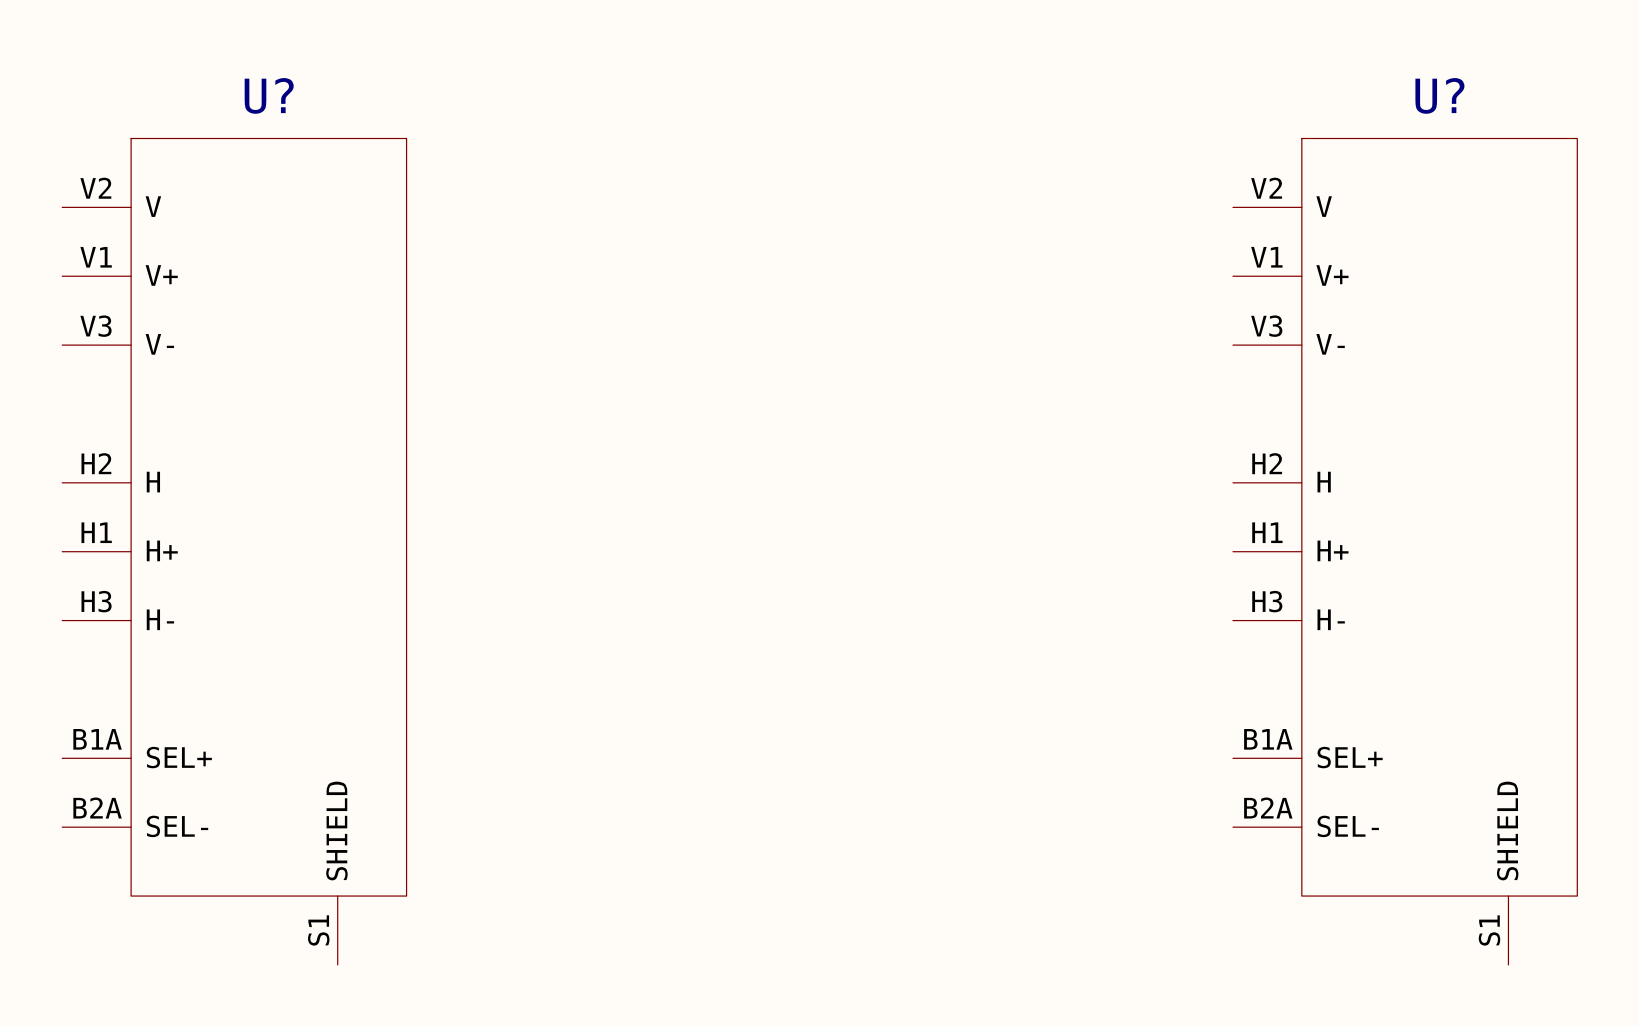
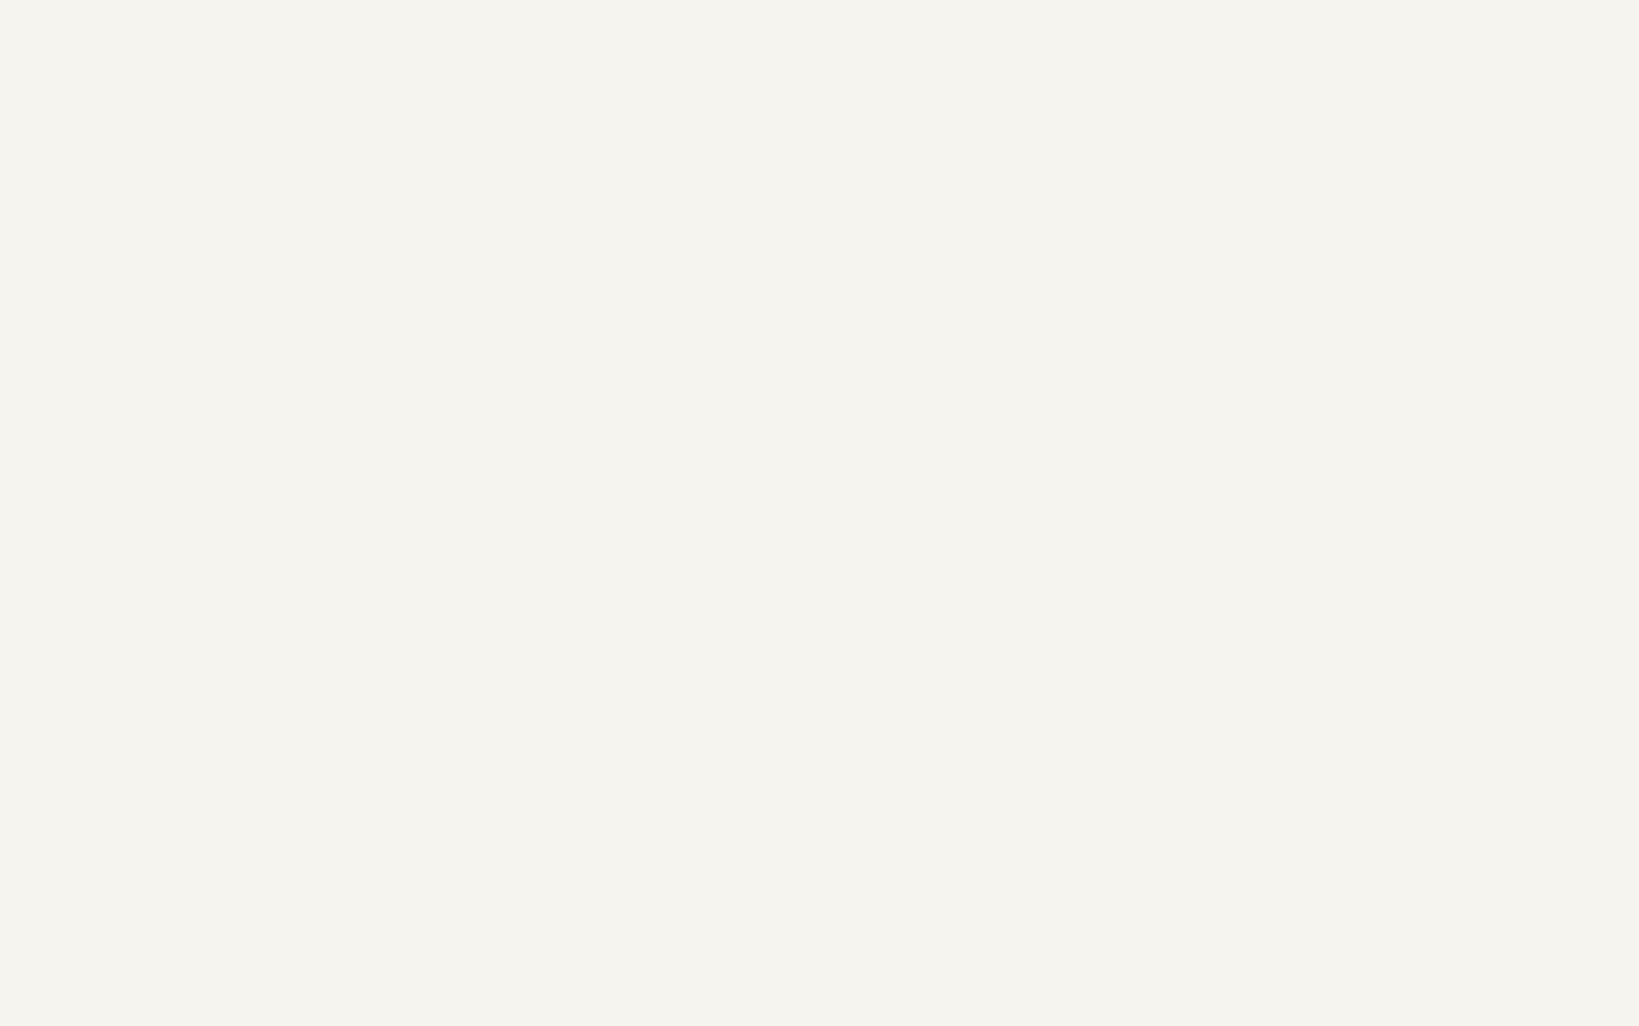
U?: (234, 551) -> none
U?: (1405, 551) -> none

